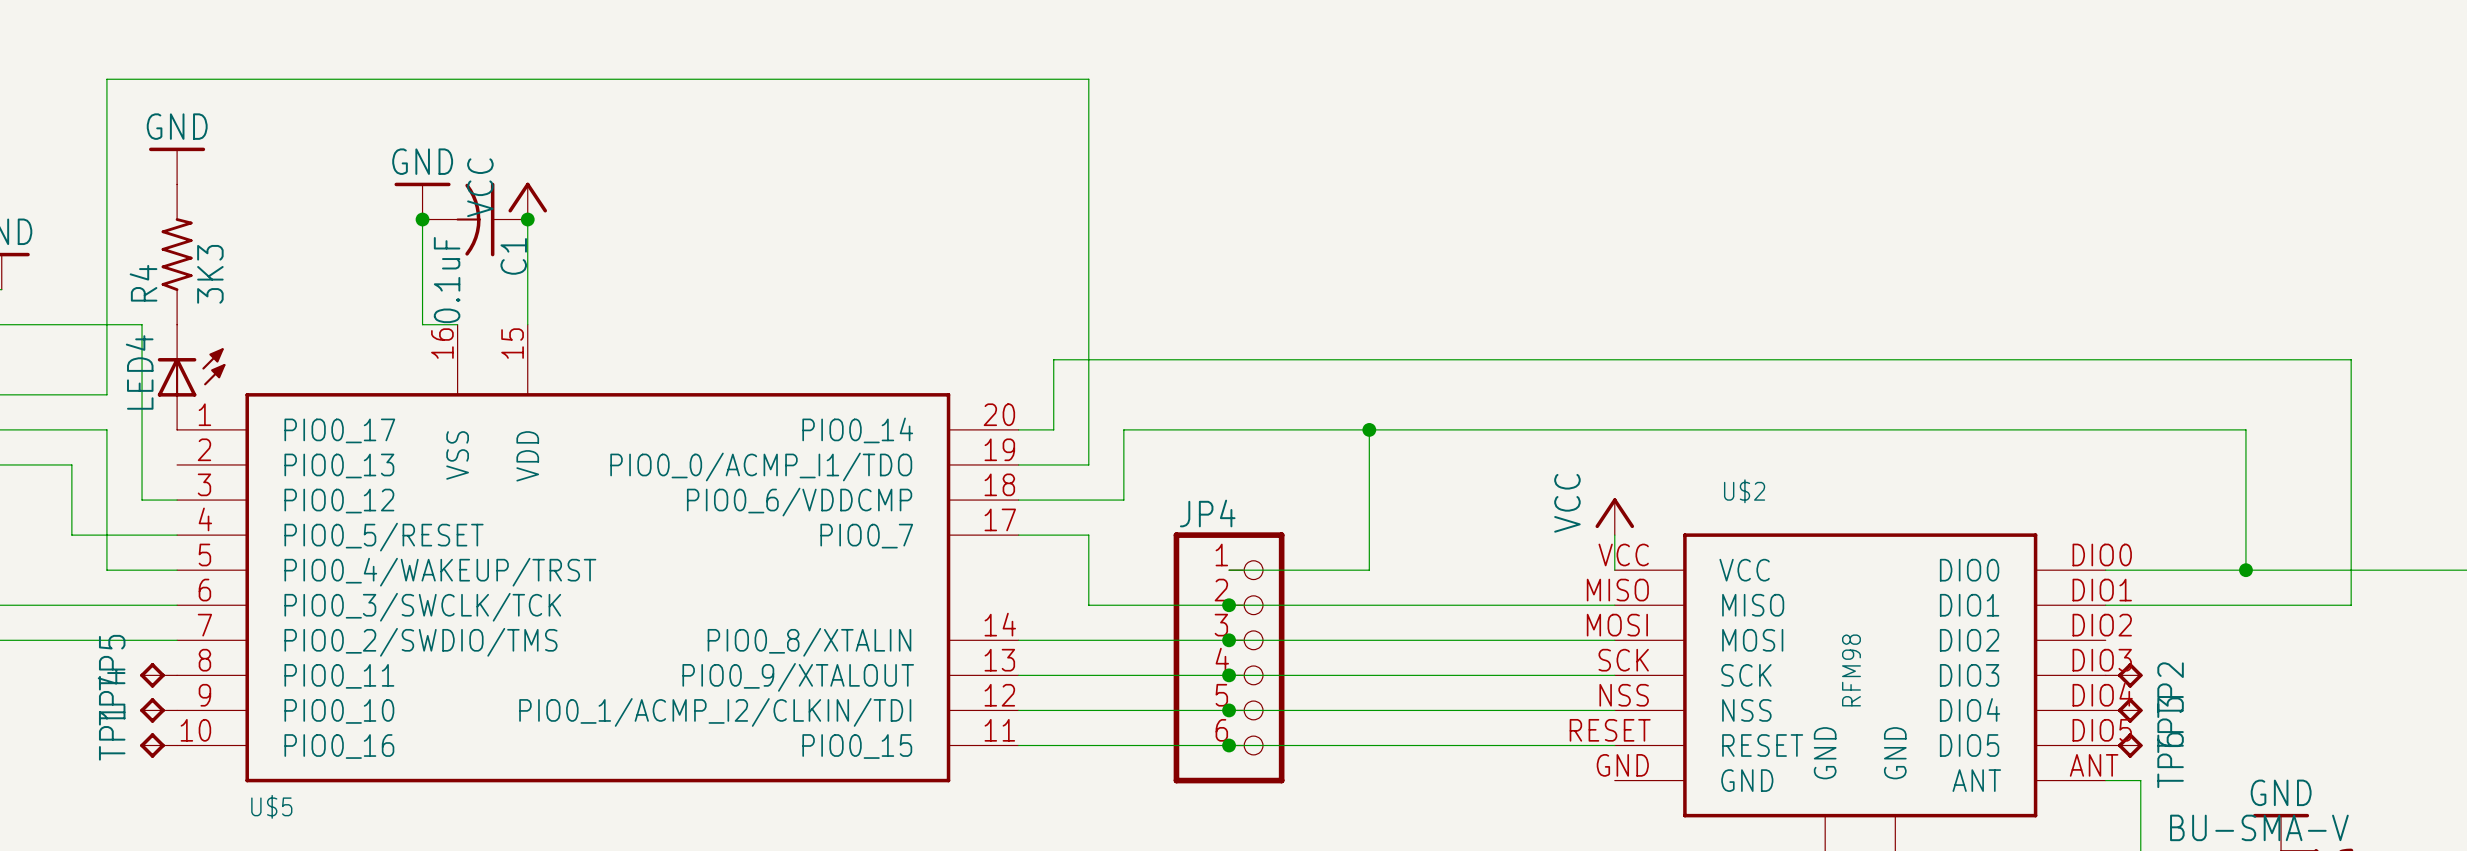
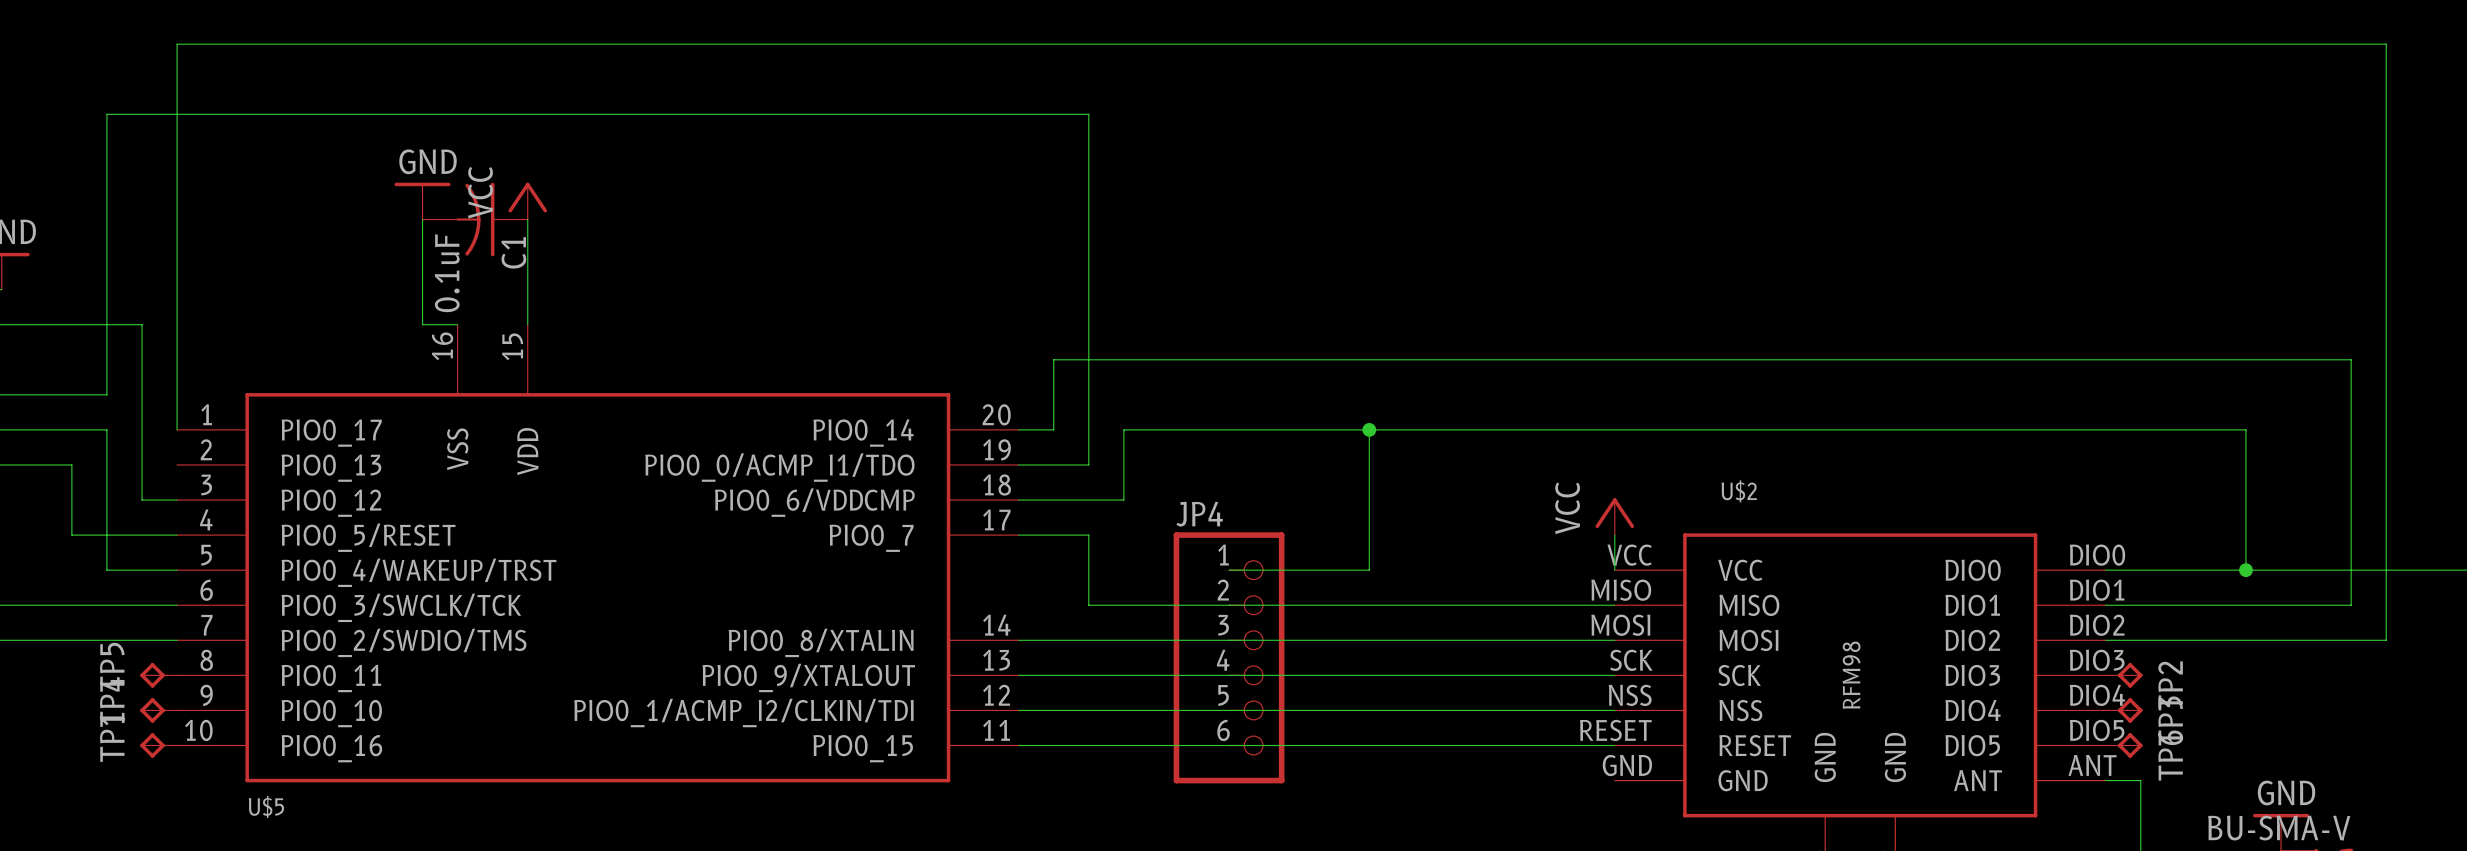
wire: (106, 114) (106, 79) (1088, 79) (1088, 114) -> (106, 114) (1088, 114)
power symbol: GND (177, 166) -> none
junction: (422, 219) -> none
junction: (527, 219) -> none
R4: 3K3 (177, 254) -> none
LED4: (191, 377) -> none
wire: none -> (177, 429) (177, 44) (2386, 44) (2386, 640) (2105, 640)
junction: (1229, 605) -> none
junction: (1229, 640) -> none
junction: (1229, 675) -> none
junction: (1229, 710) -> none
junction: (1229, 745) -> none

